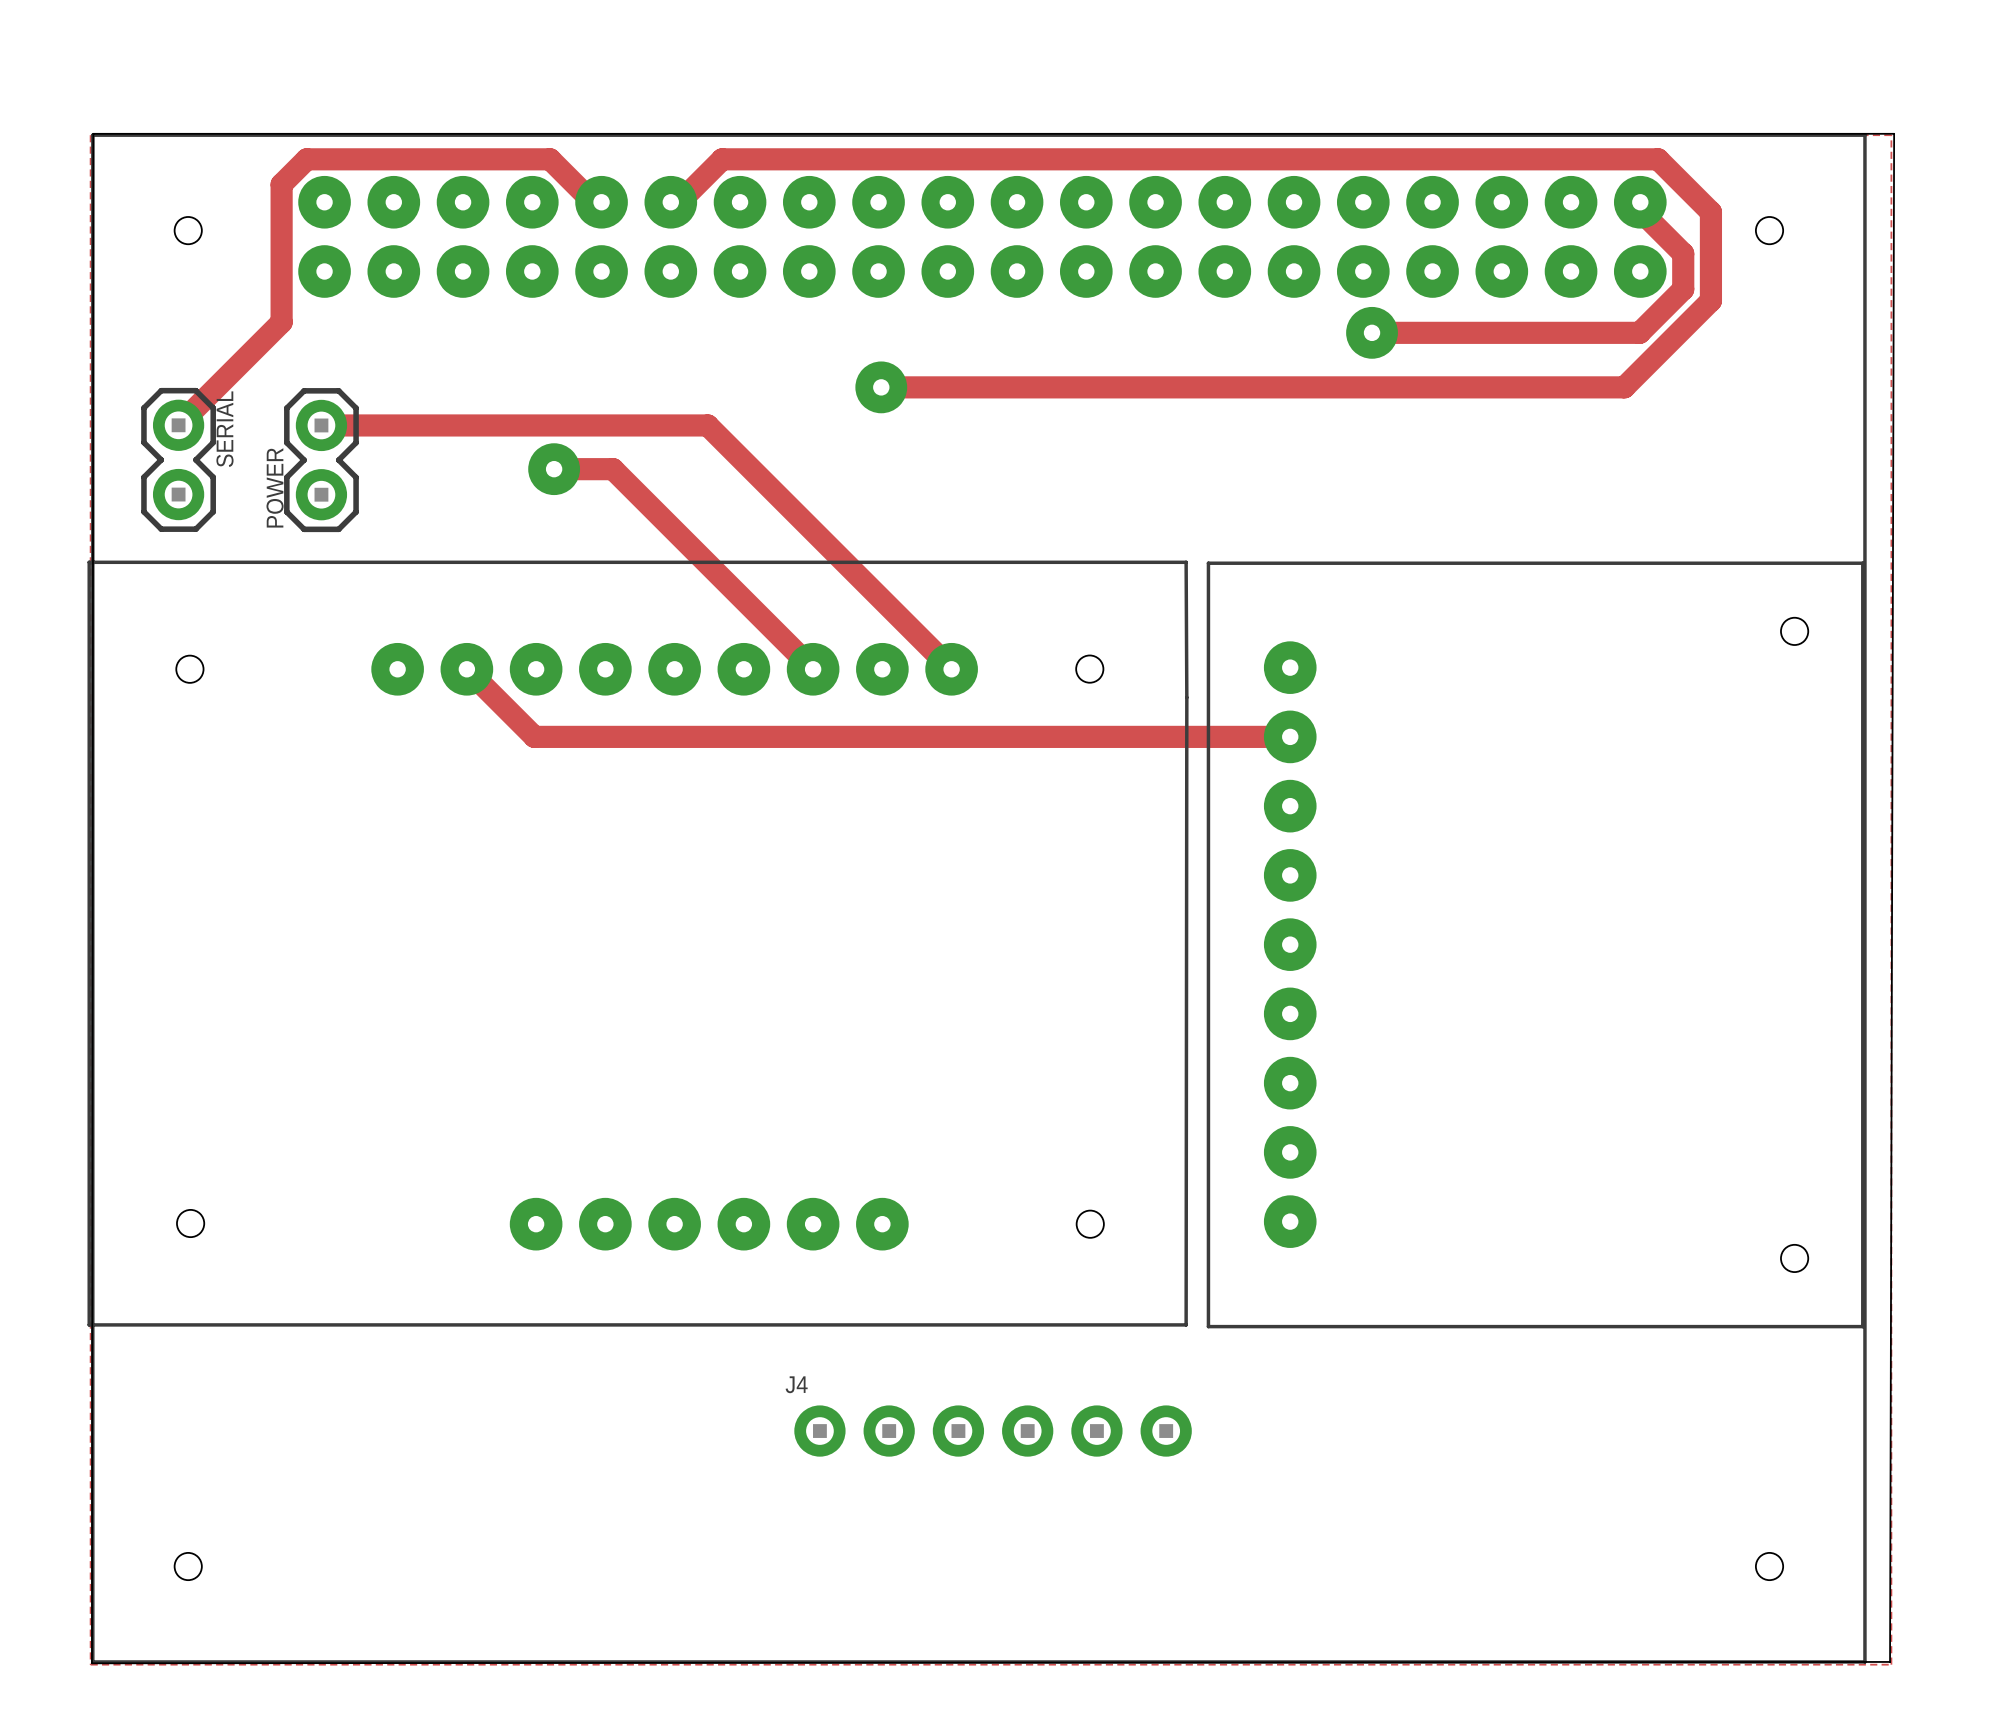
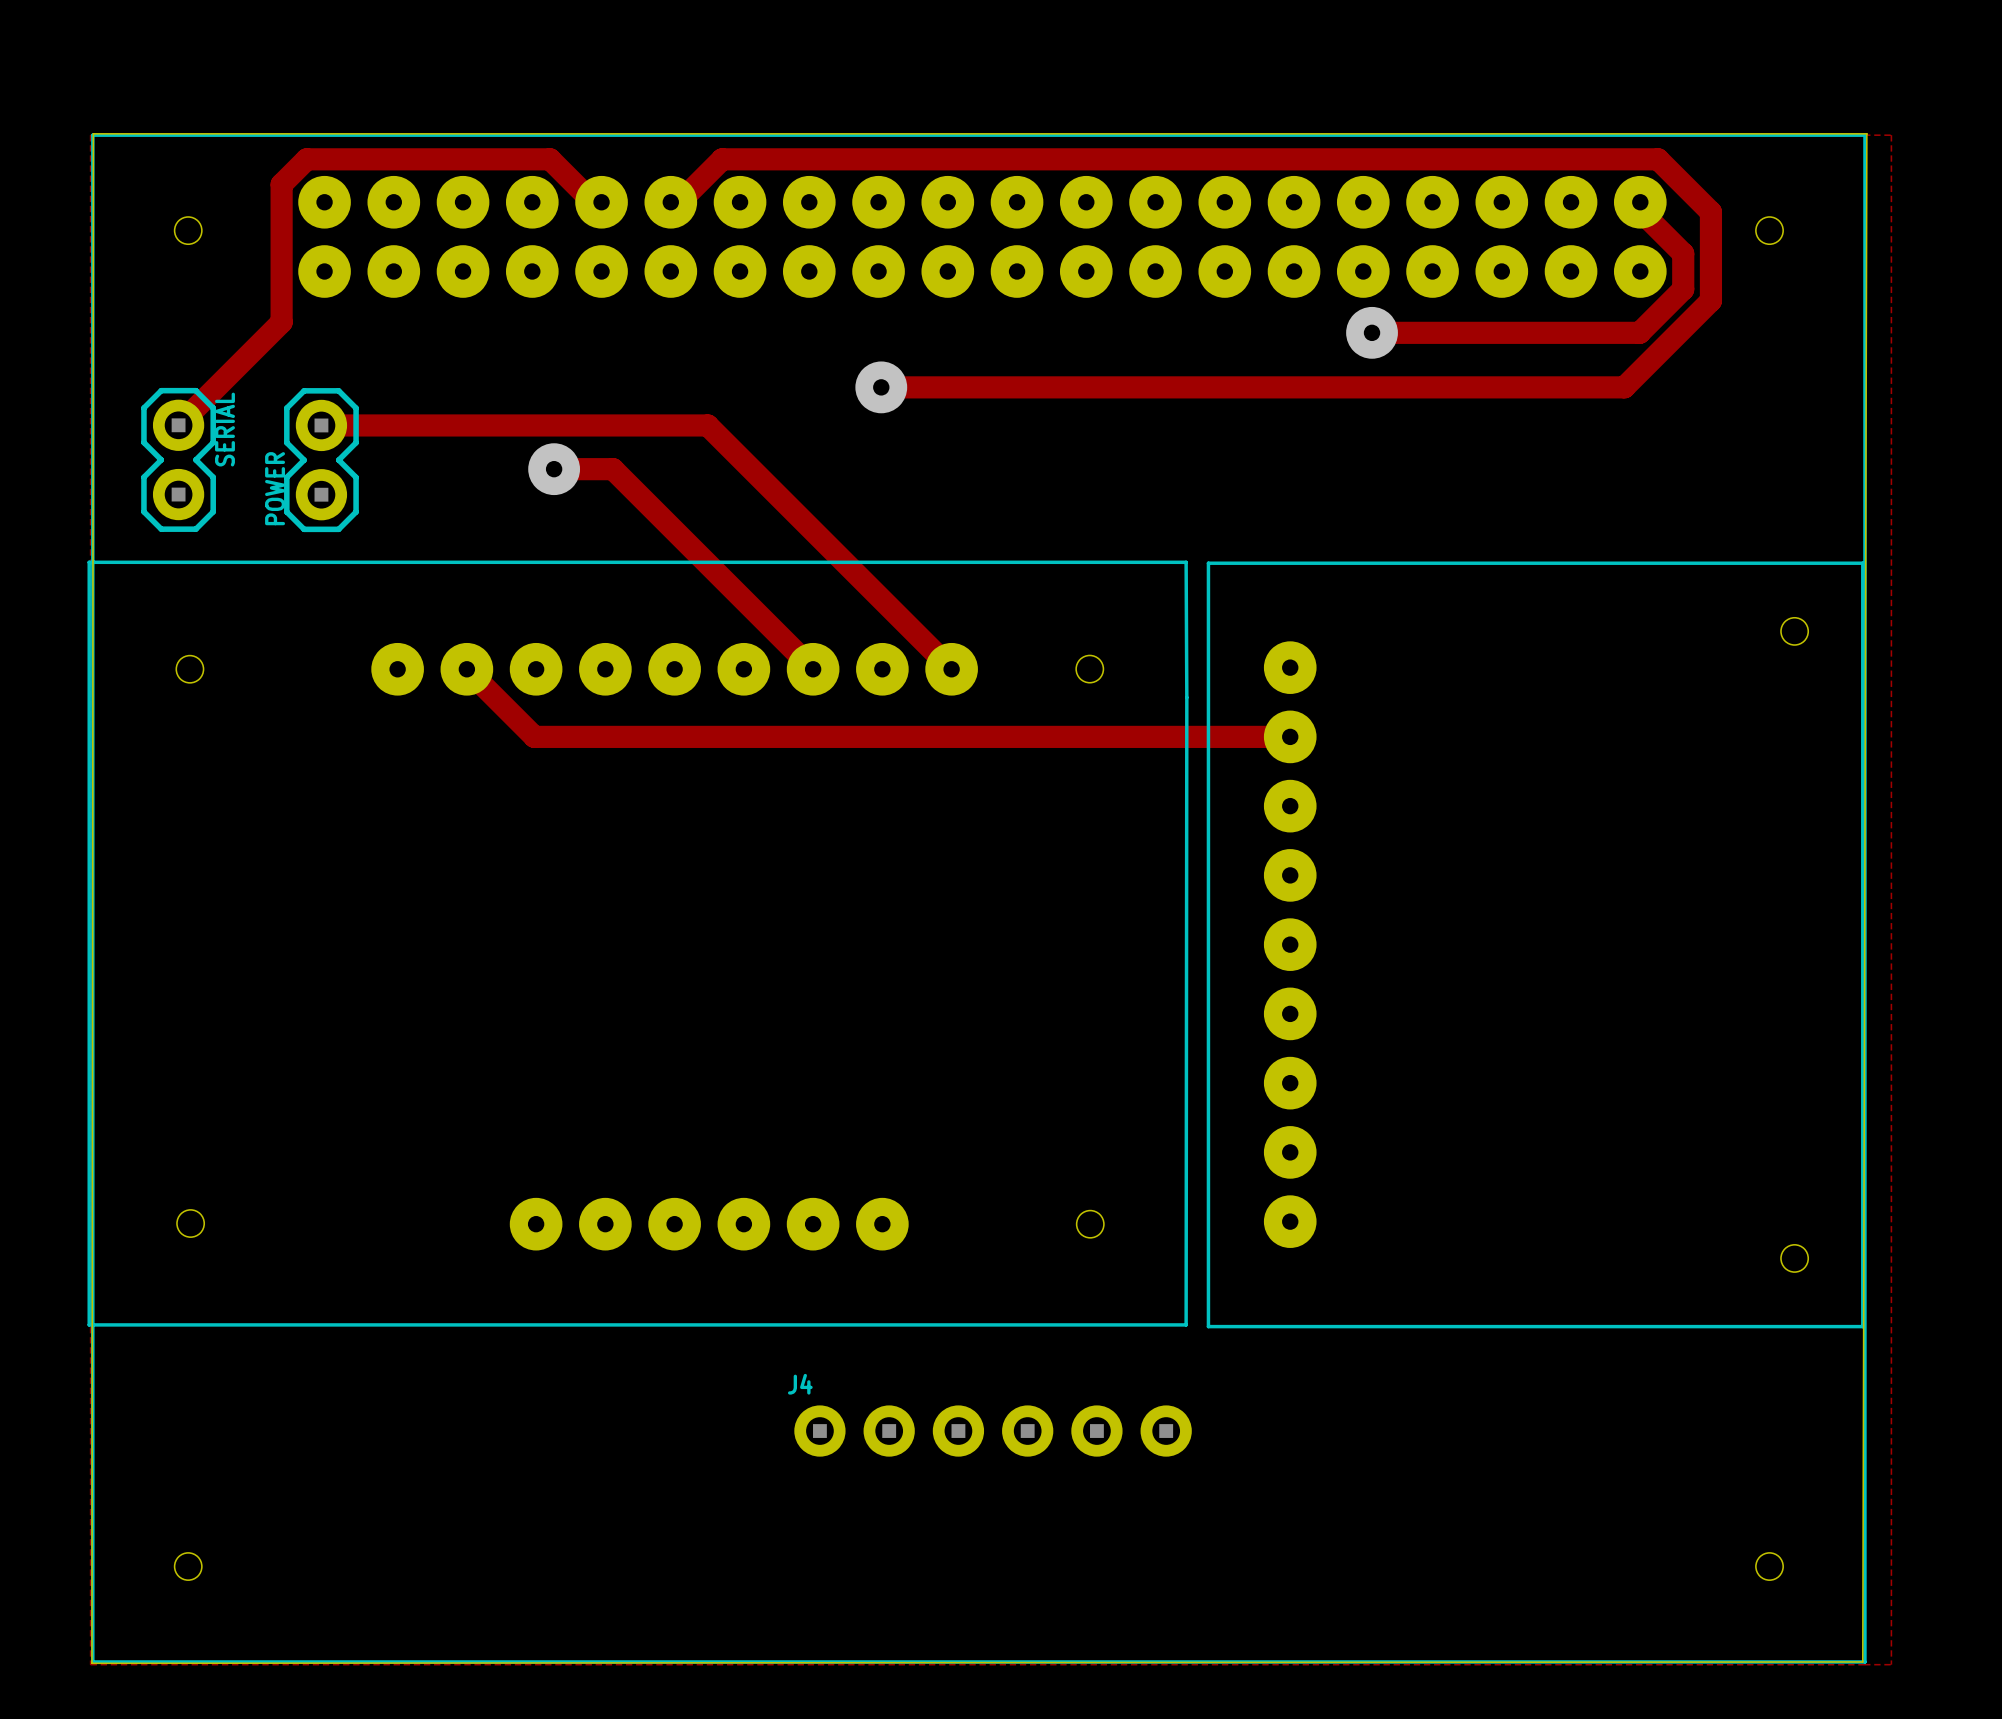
board edge: (1866, 133) (1894, 133) (1890, 1661) (1862, 1661) -> (1866, 133) (1862, 1661)

